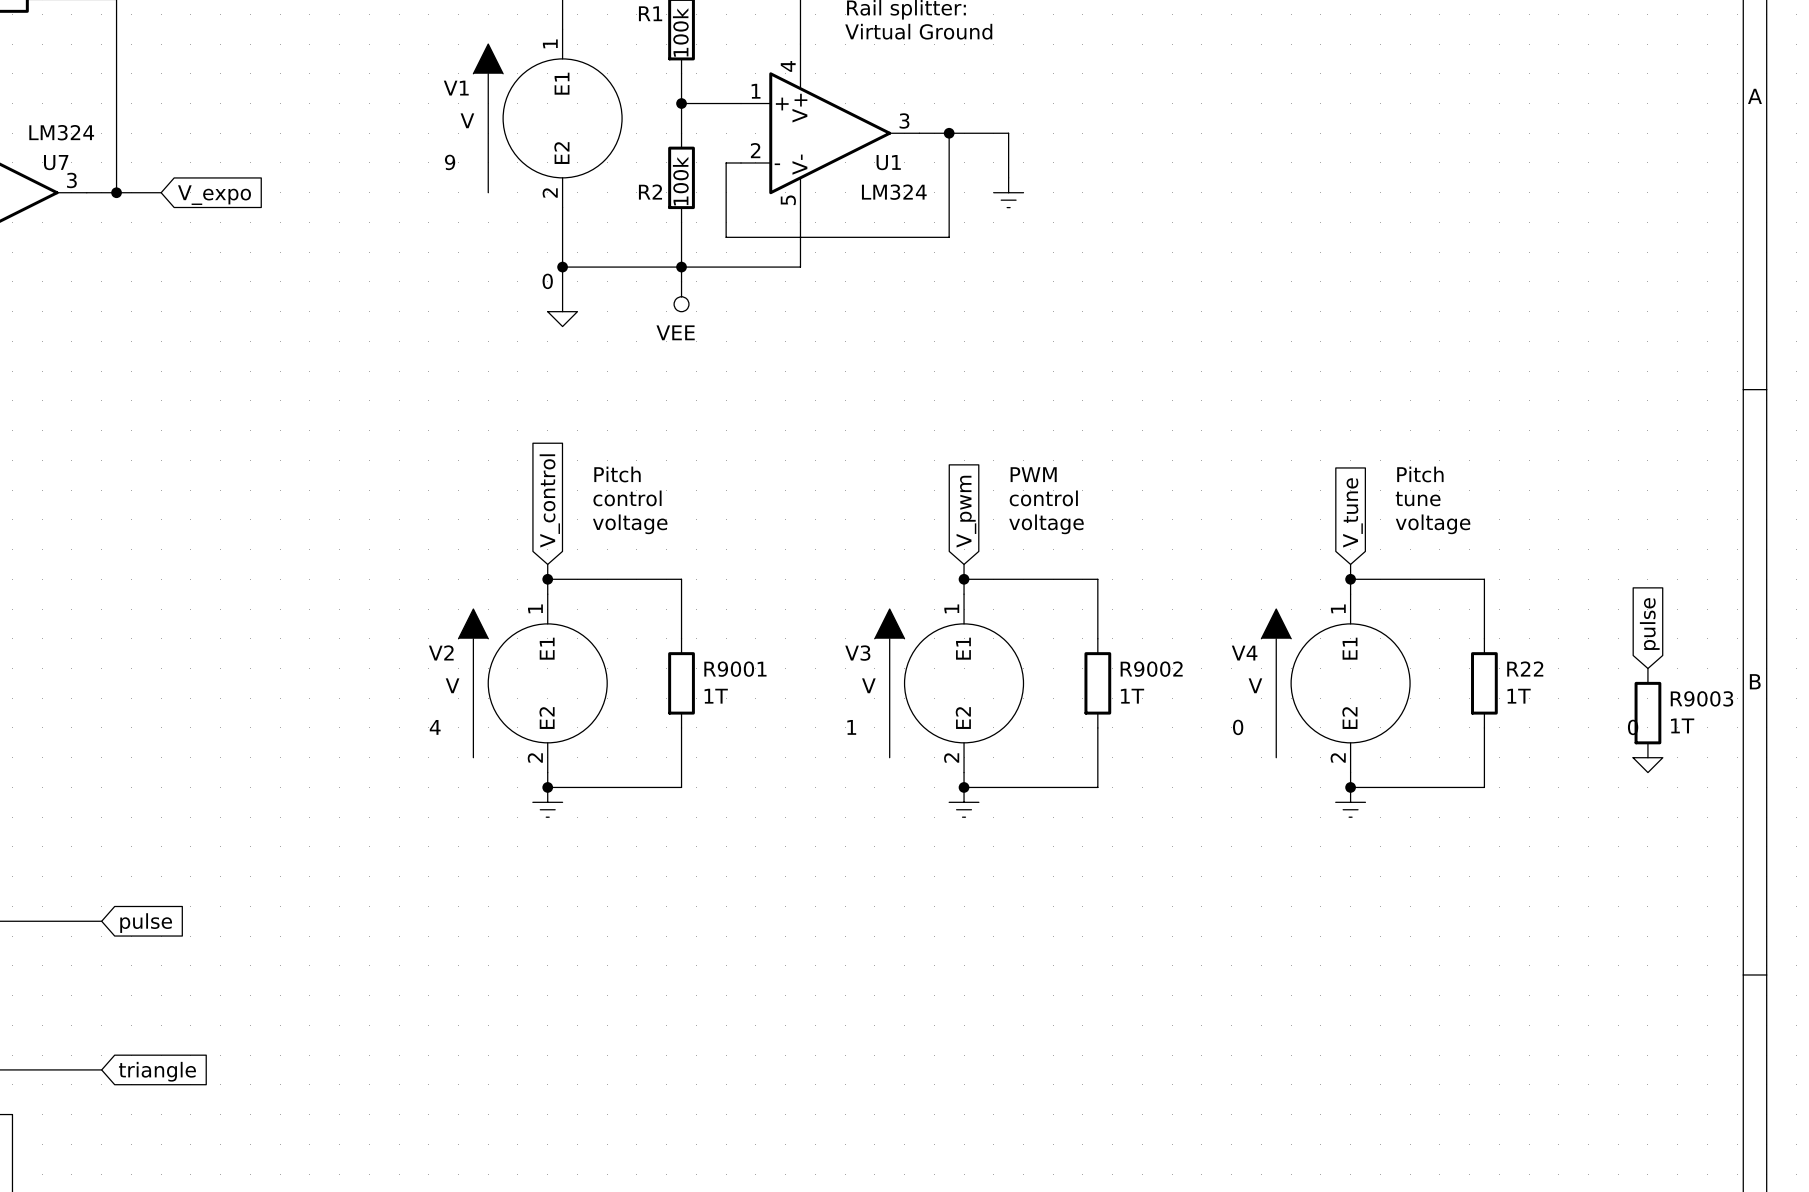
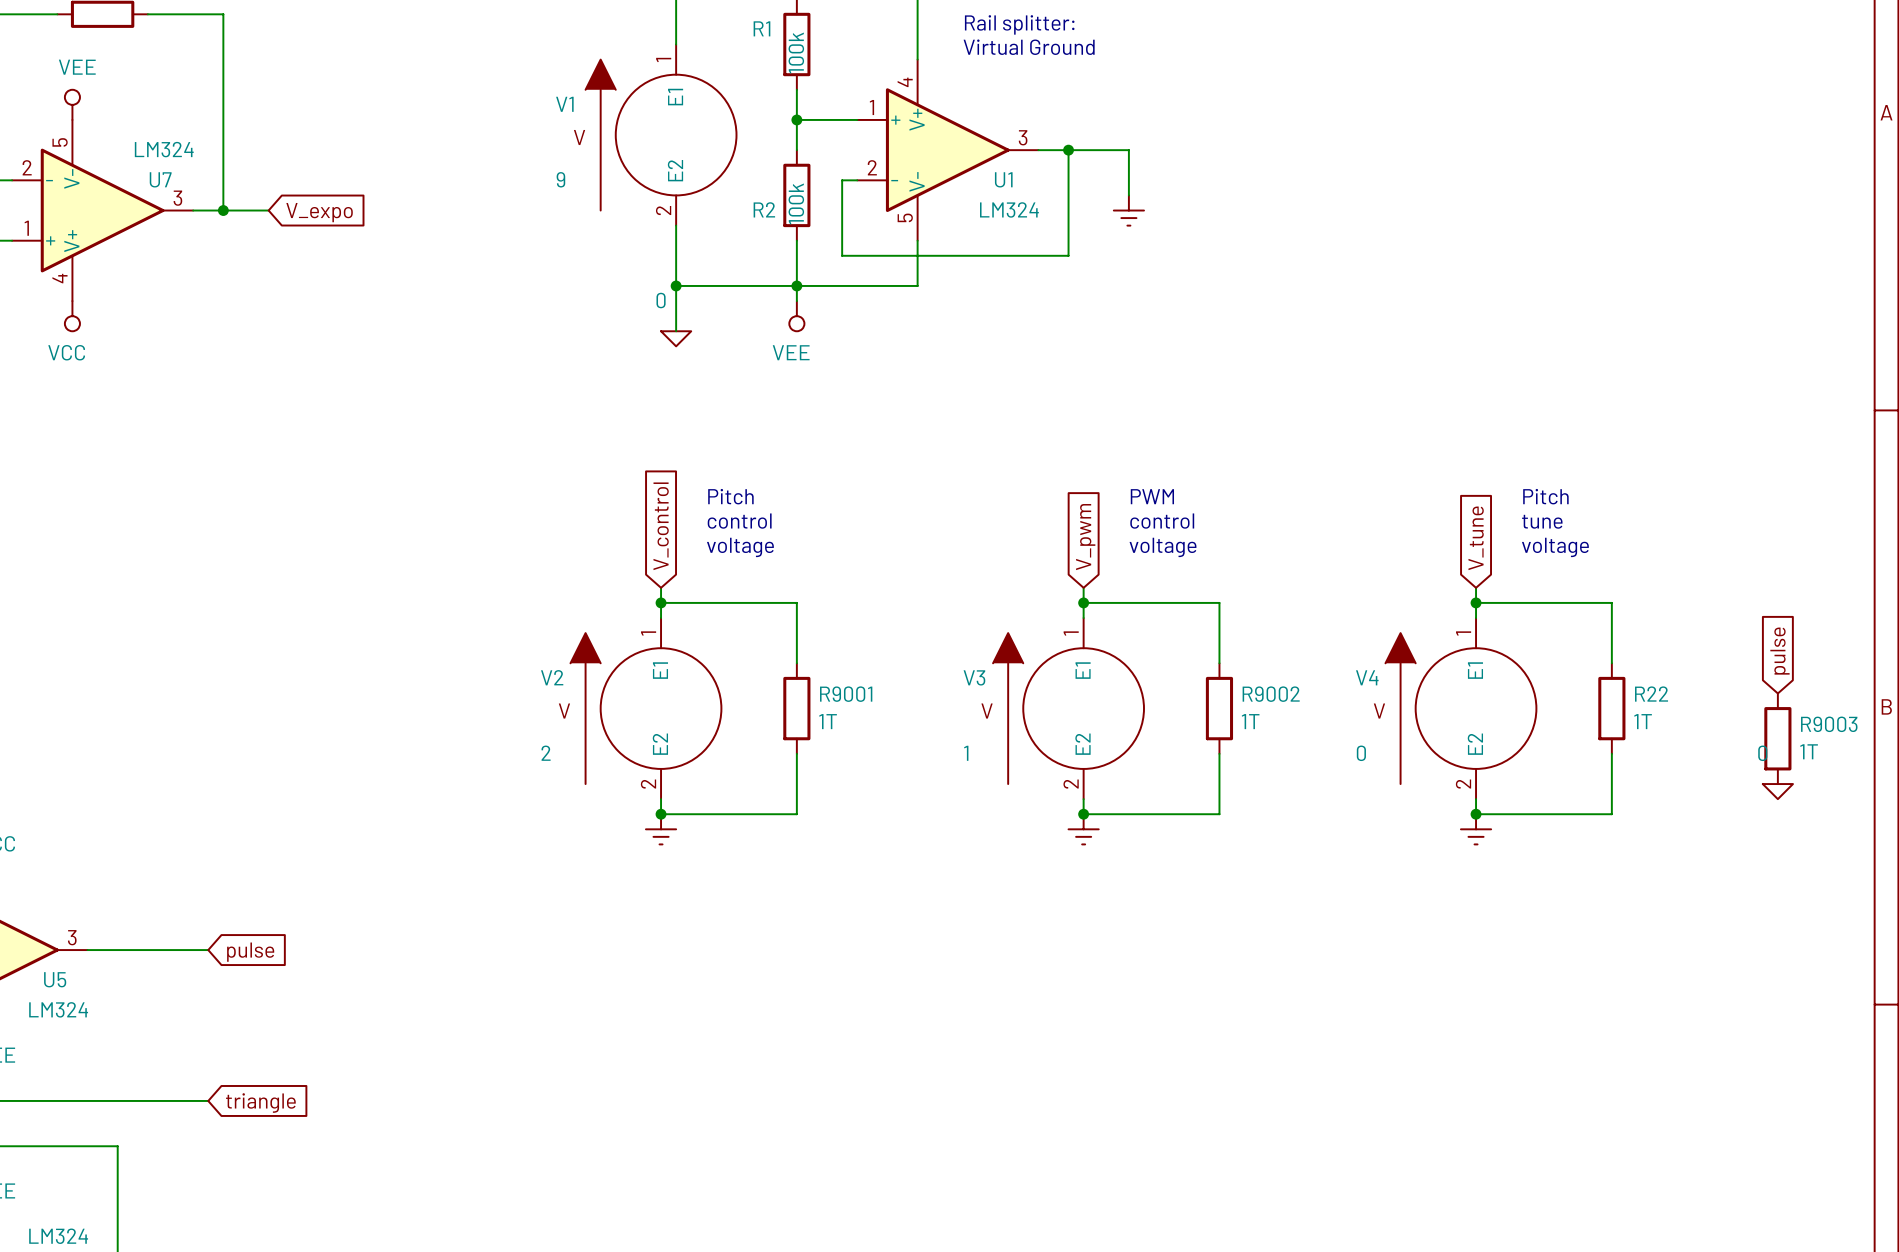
V2 value: 4 (435, 727) -> 2 (546, 753)

